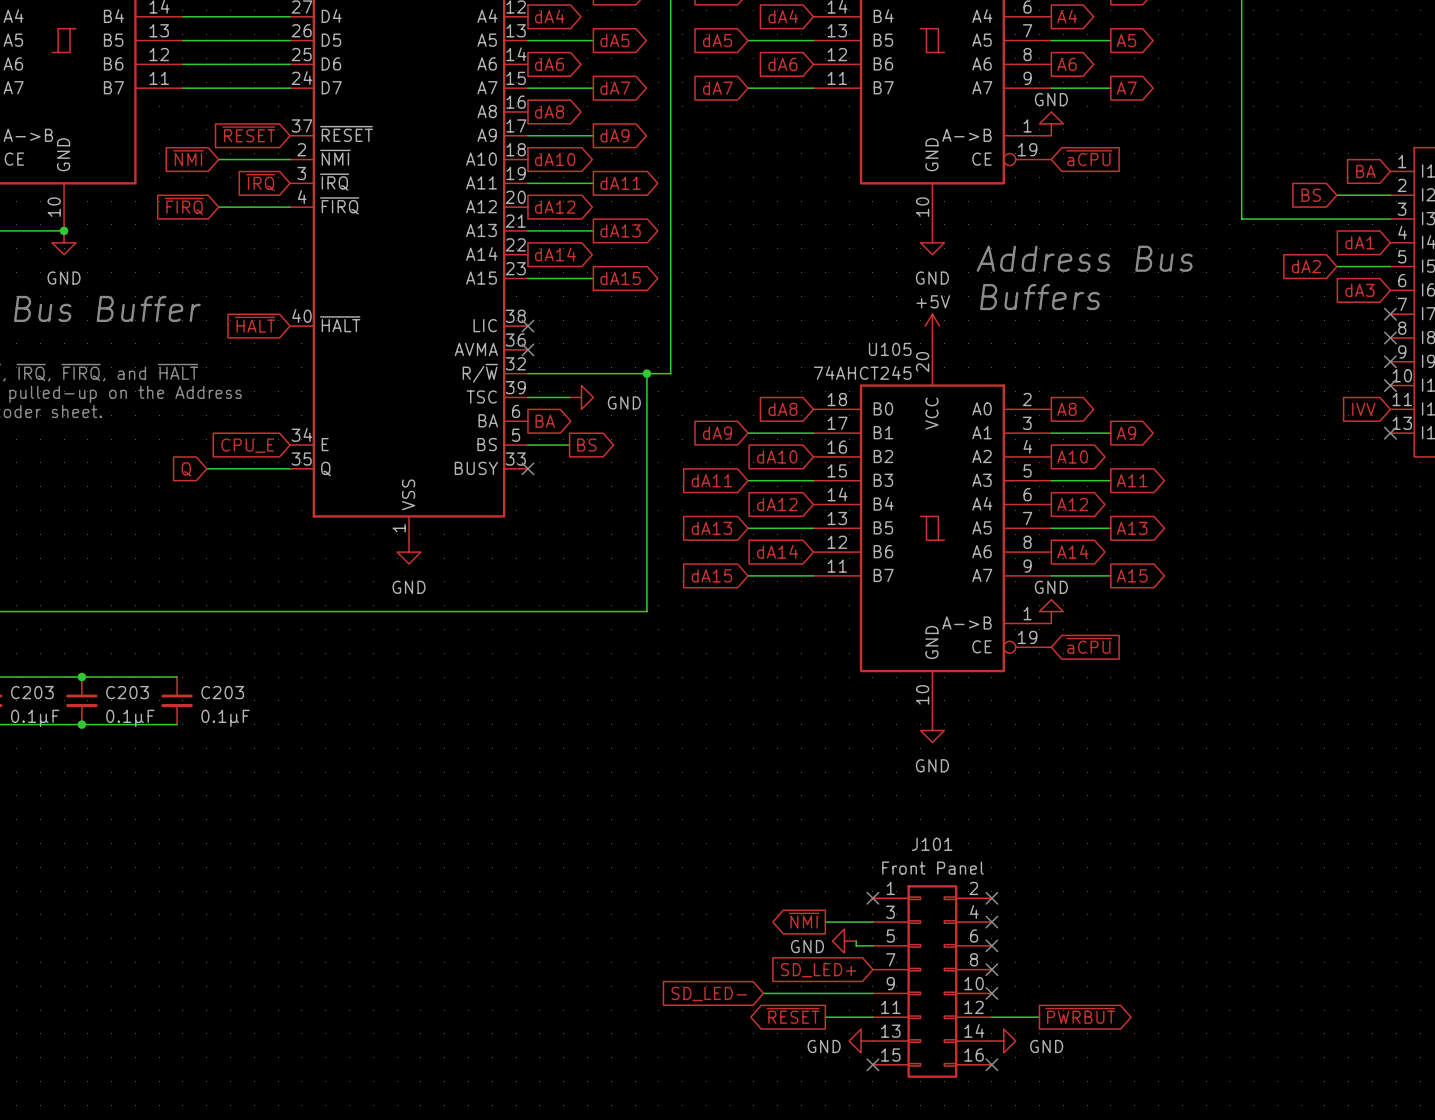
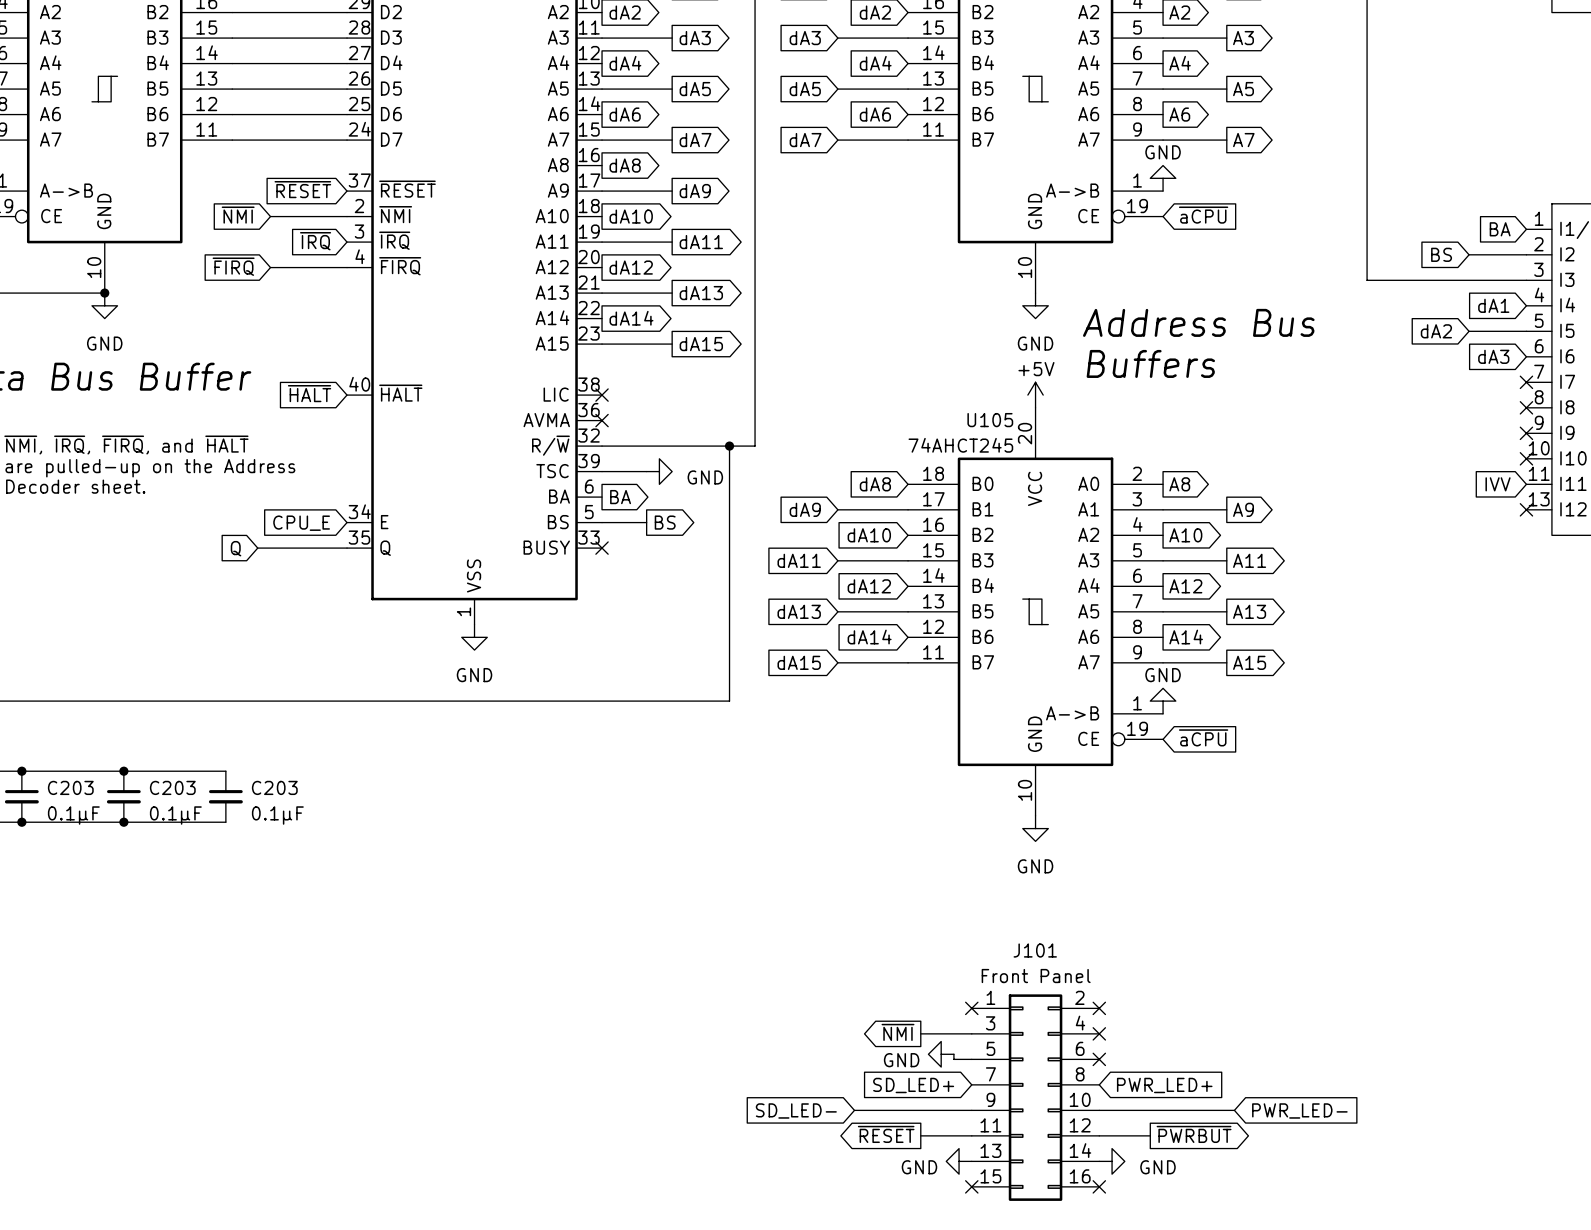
no-connect mark: (991, 969) -> none
global label: none -> PWR_LED+ (1164, 1085)
wire: none -> (1099, 1110) (1234, 1110)
no-connect mark: (991, 993) -> none
global label: none -> PWR_LED- (1299, 1110)

